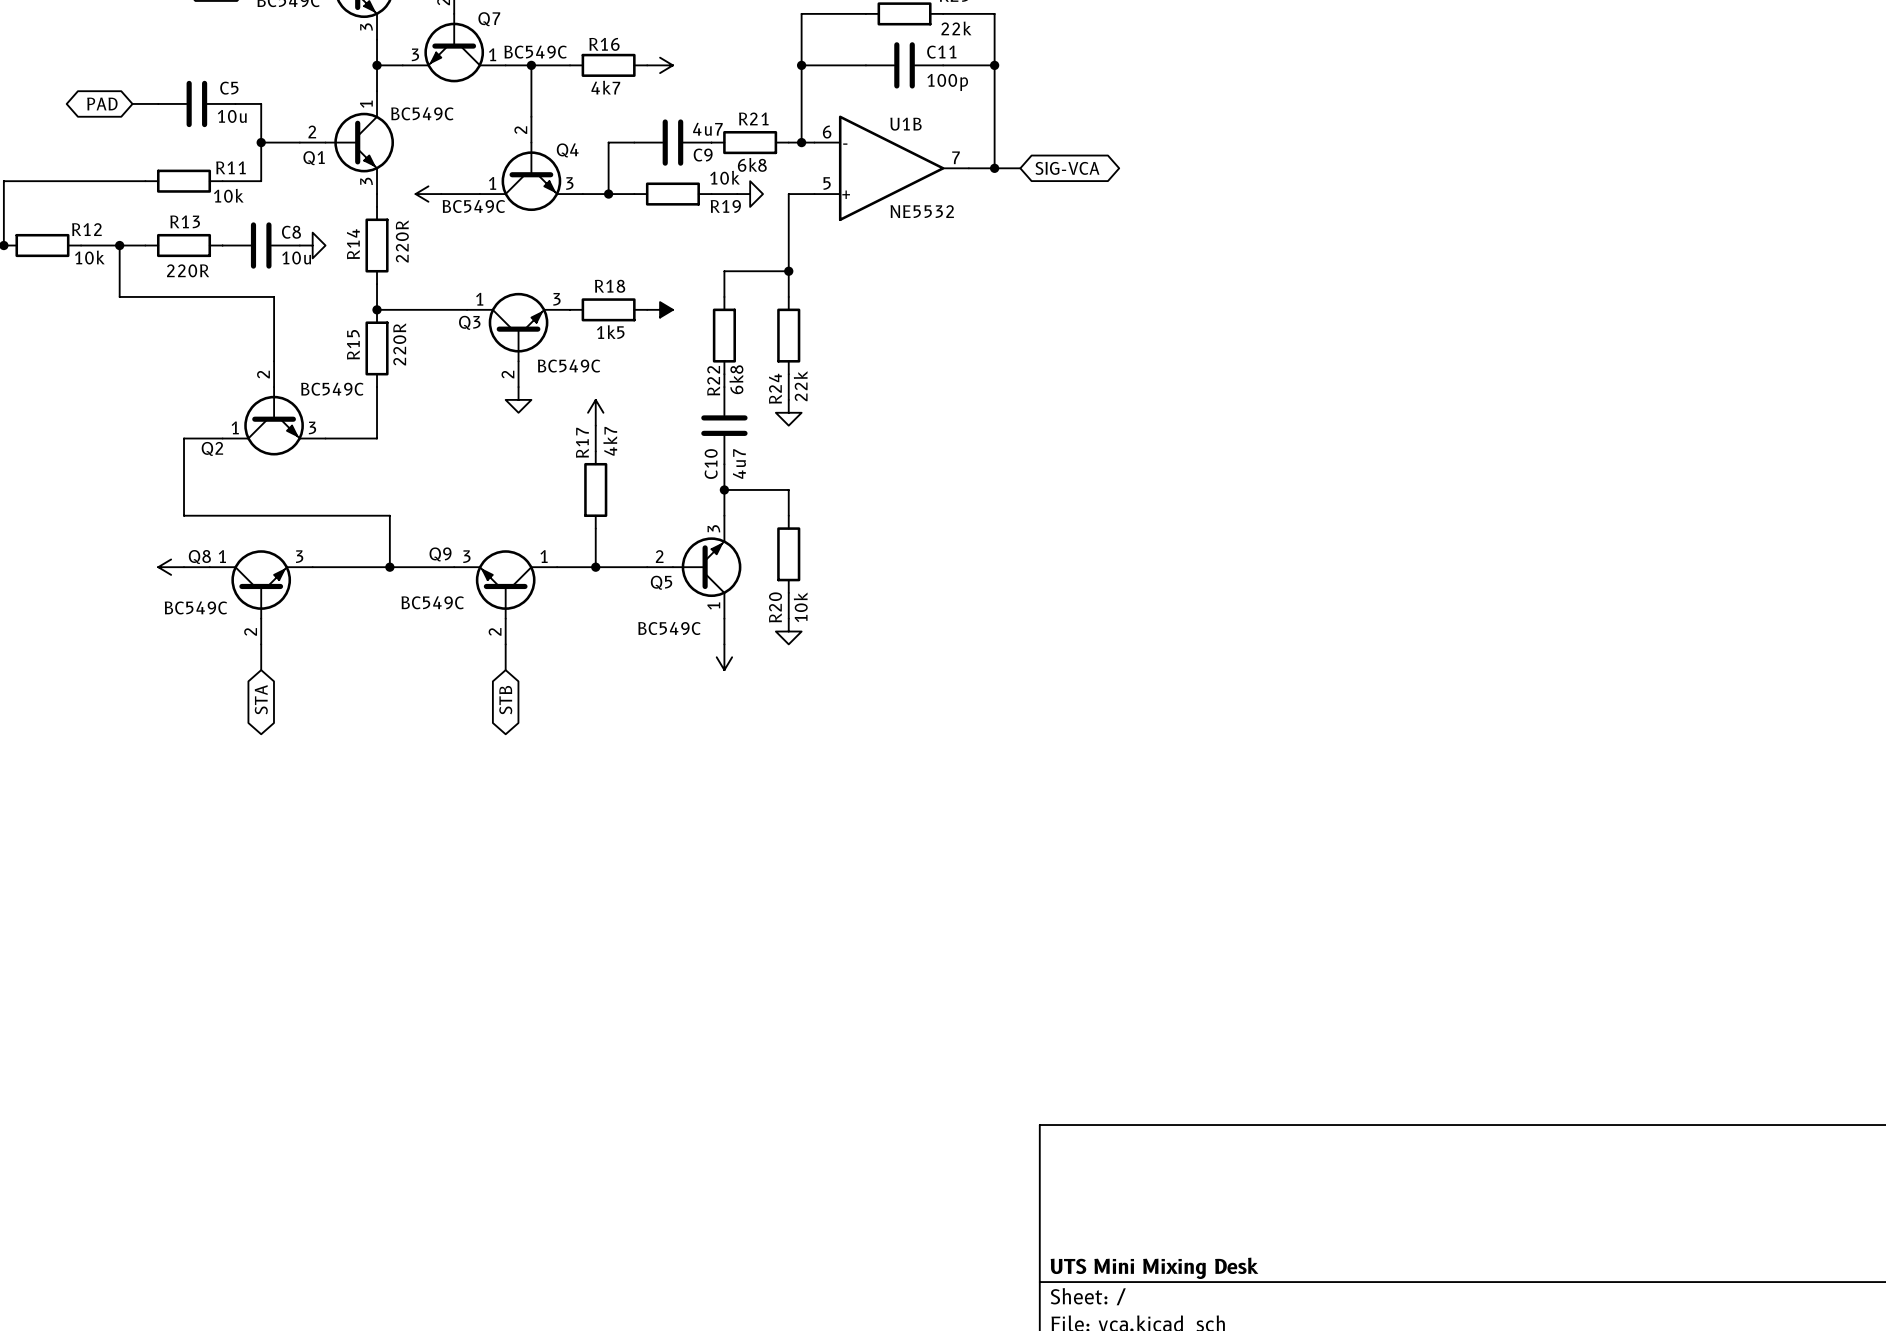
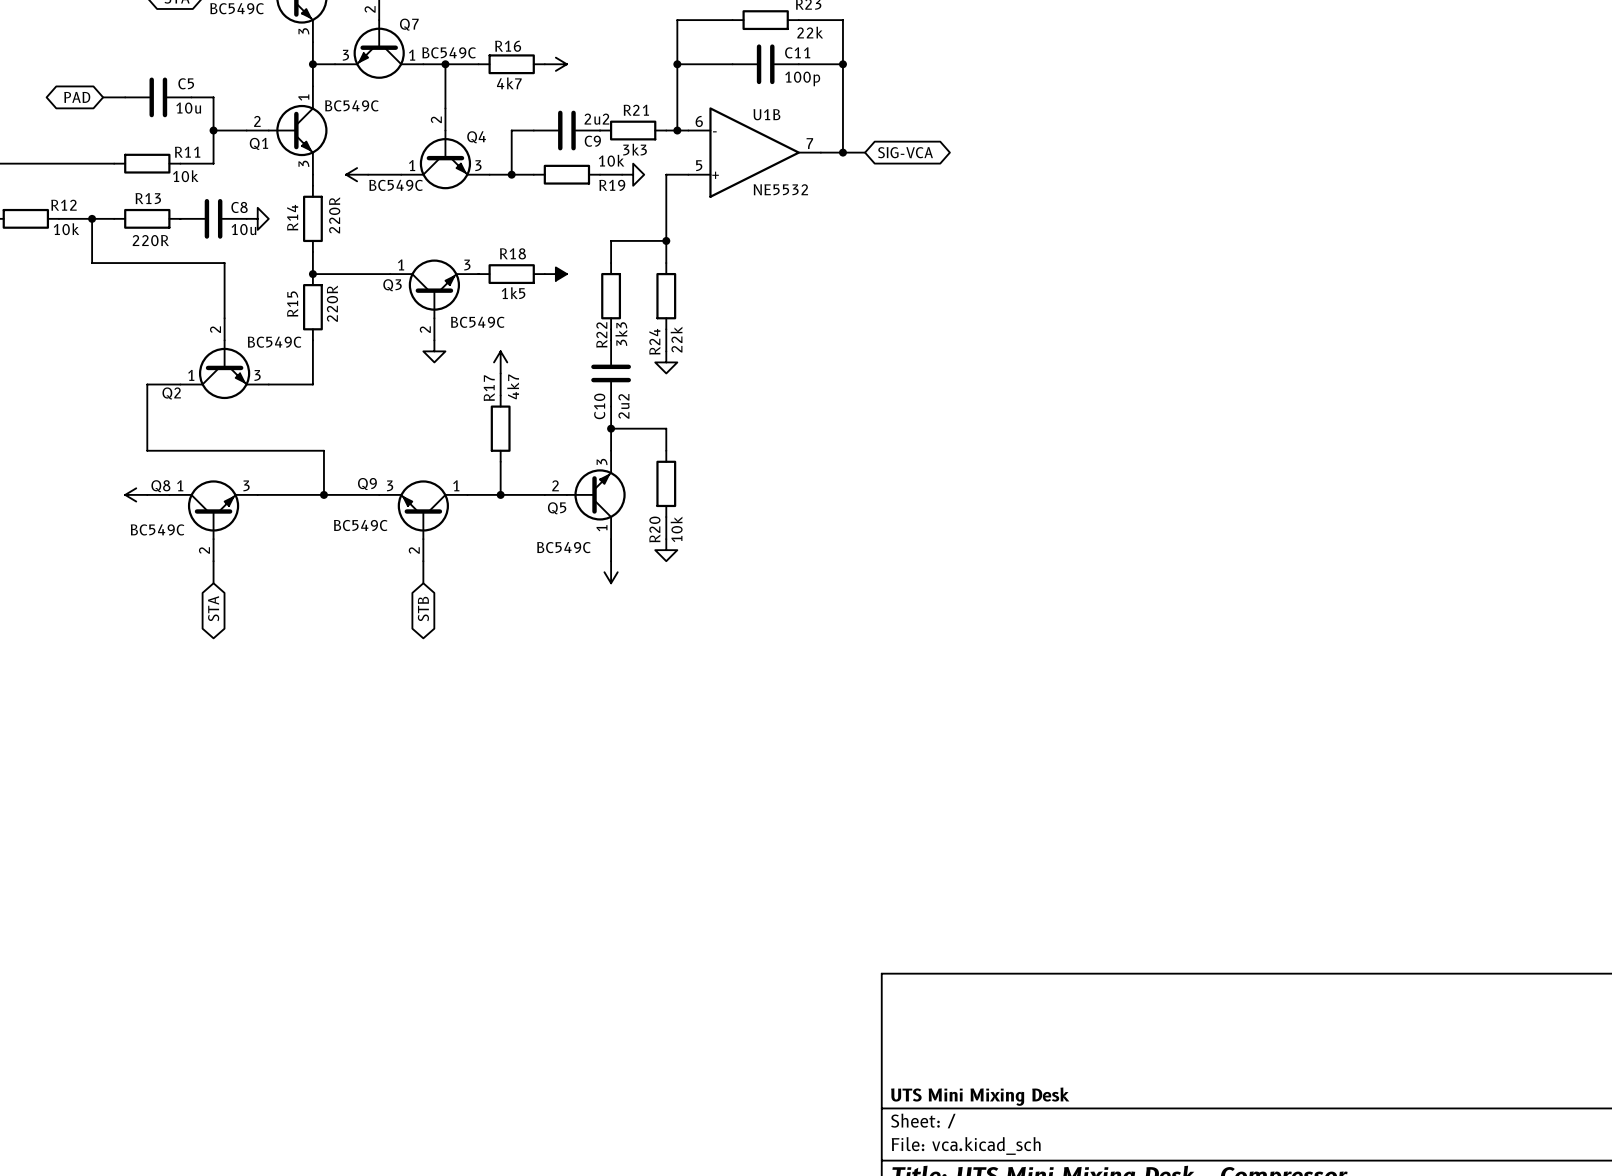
C9 value: 4u7 (707, 129) -> 2u2 (596, 119)
R21 value: 6k8 (752, 164) -> 3k3 (635, 149)
R22 value: 6k8 (736, 379) -> 3k3 (621, 334)
C10 value: 4u7 (739, 464) -> 2u2 (623, 406)

